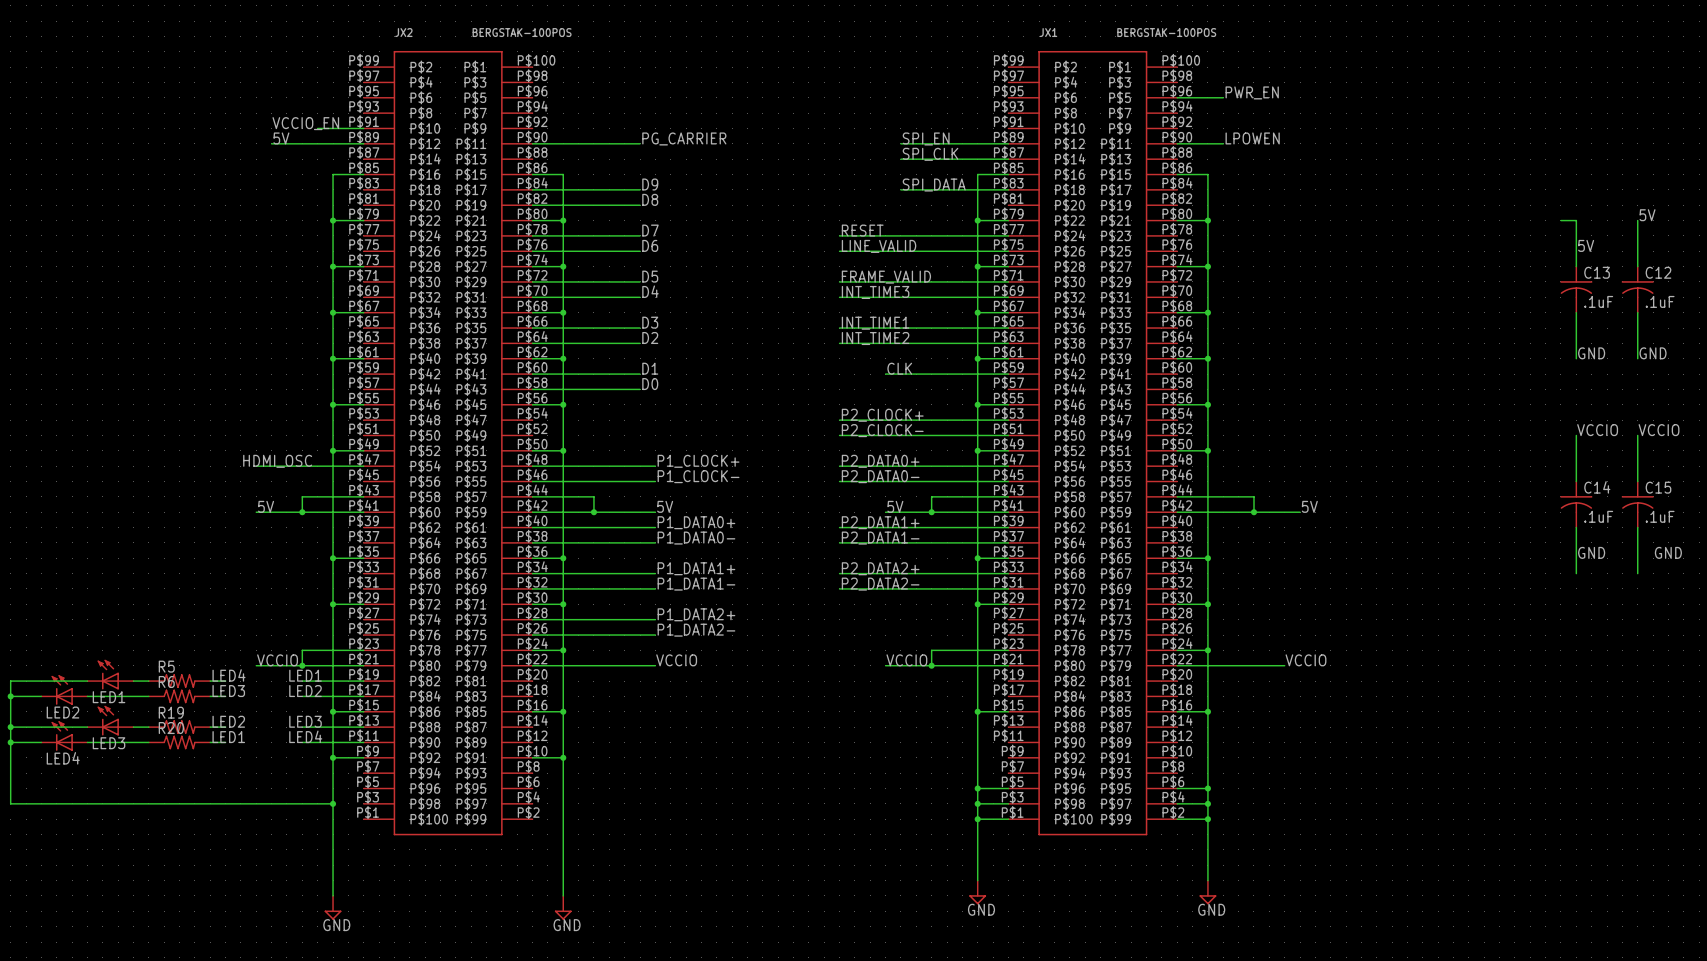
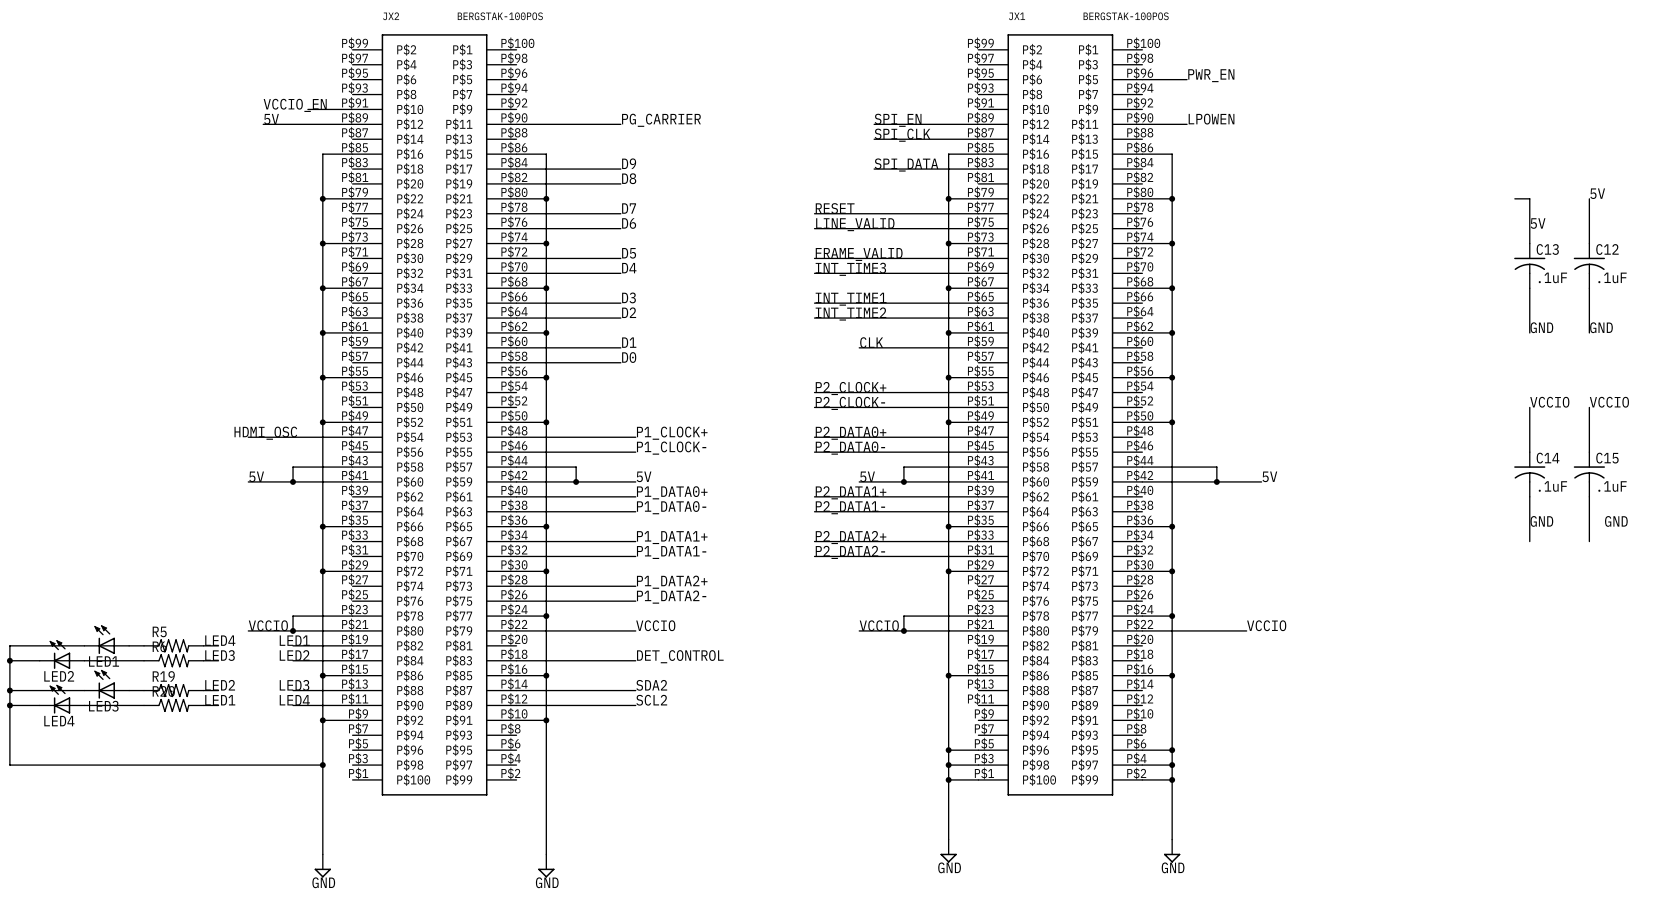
label: none -> DET_CONTROL (680, 656)
wire: none -> (516, 660) (635, 660)
label: none -> SDA2 (651, 685)
wire: none -> (516, 690) (635, 690)
label: none -> SCL2 (651, 700)
wire: none -> (516, 705) (635, 705)

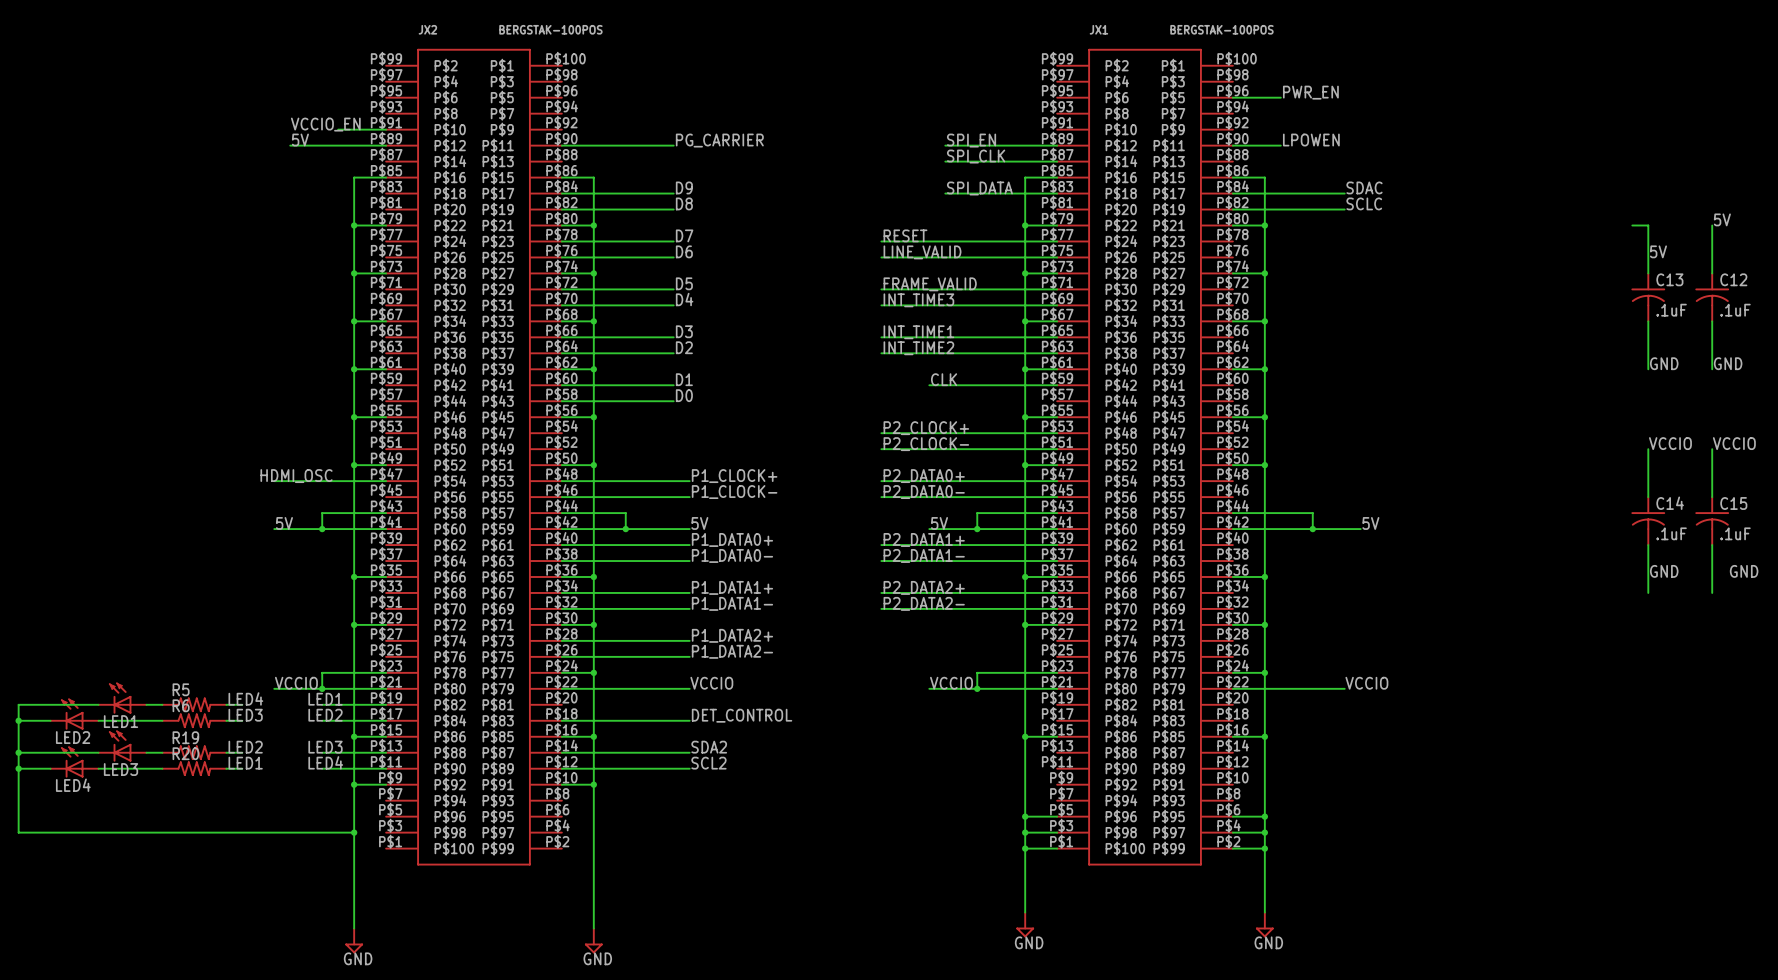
label: none -> SDAC (1364, 187)
wire: none -> (1232, 193) (1344, 193)
label: none -> SCLC (1364, 203)
wire: none -> (1232, 209) (1344, 209)

